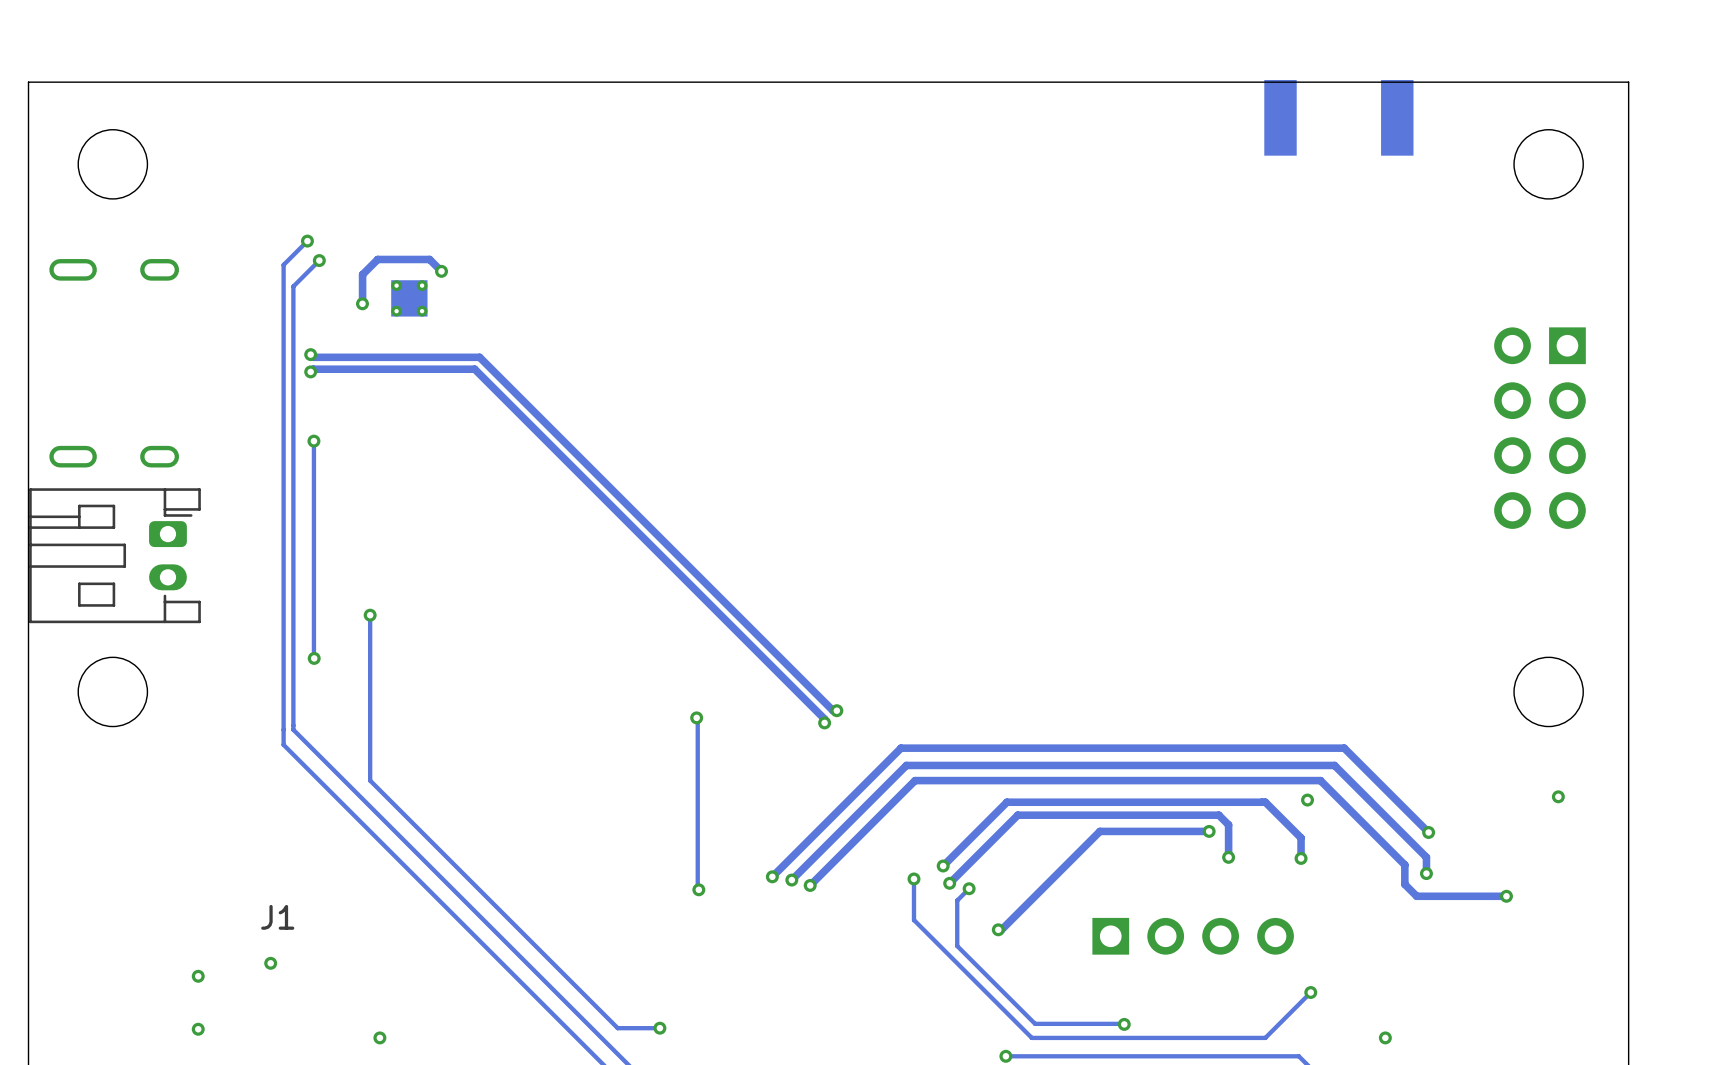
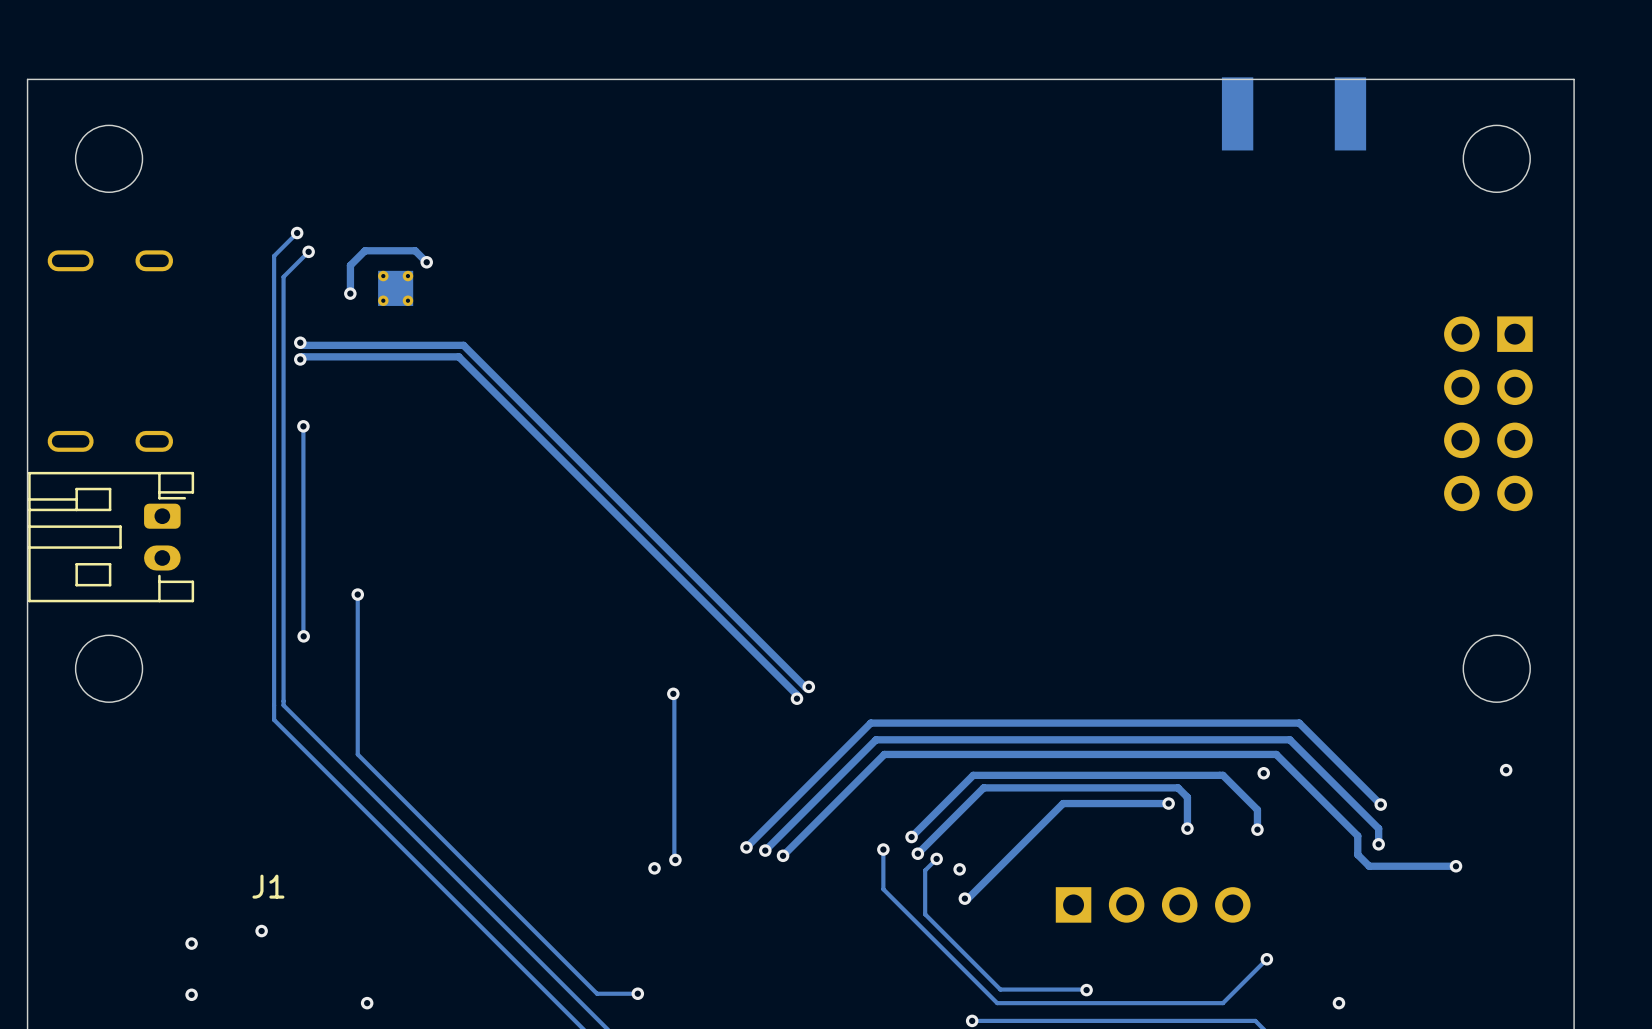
via: none -> (654, 868)
via: none -> (959, 869)

